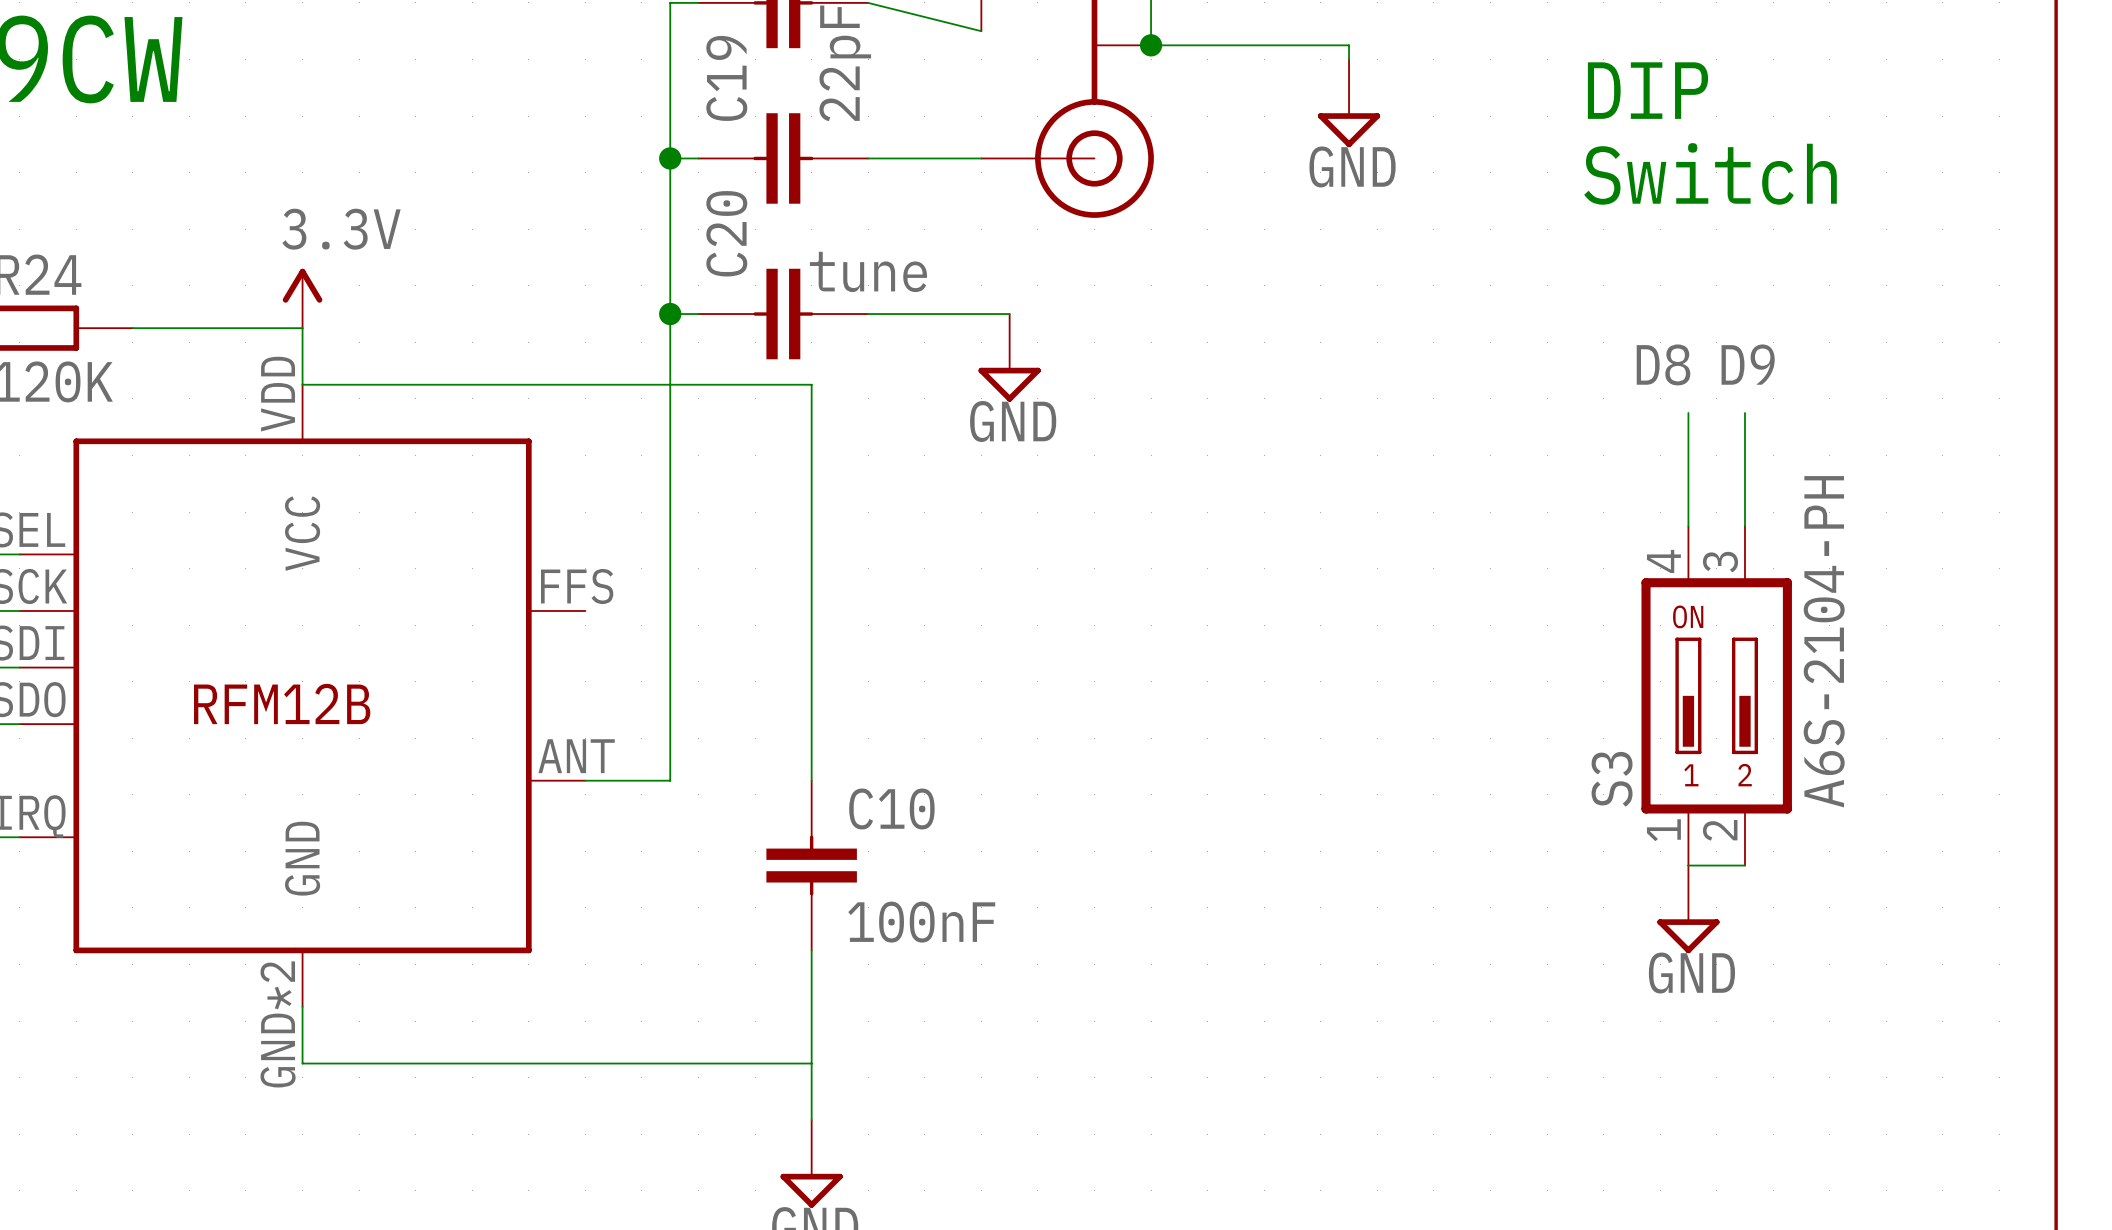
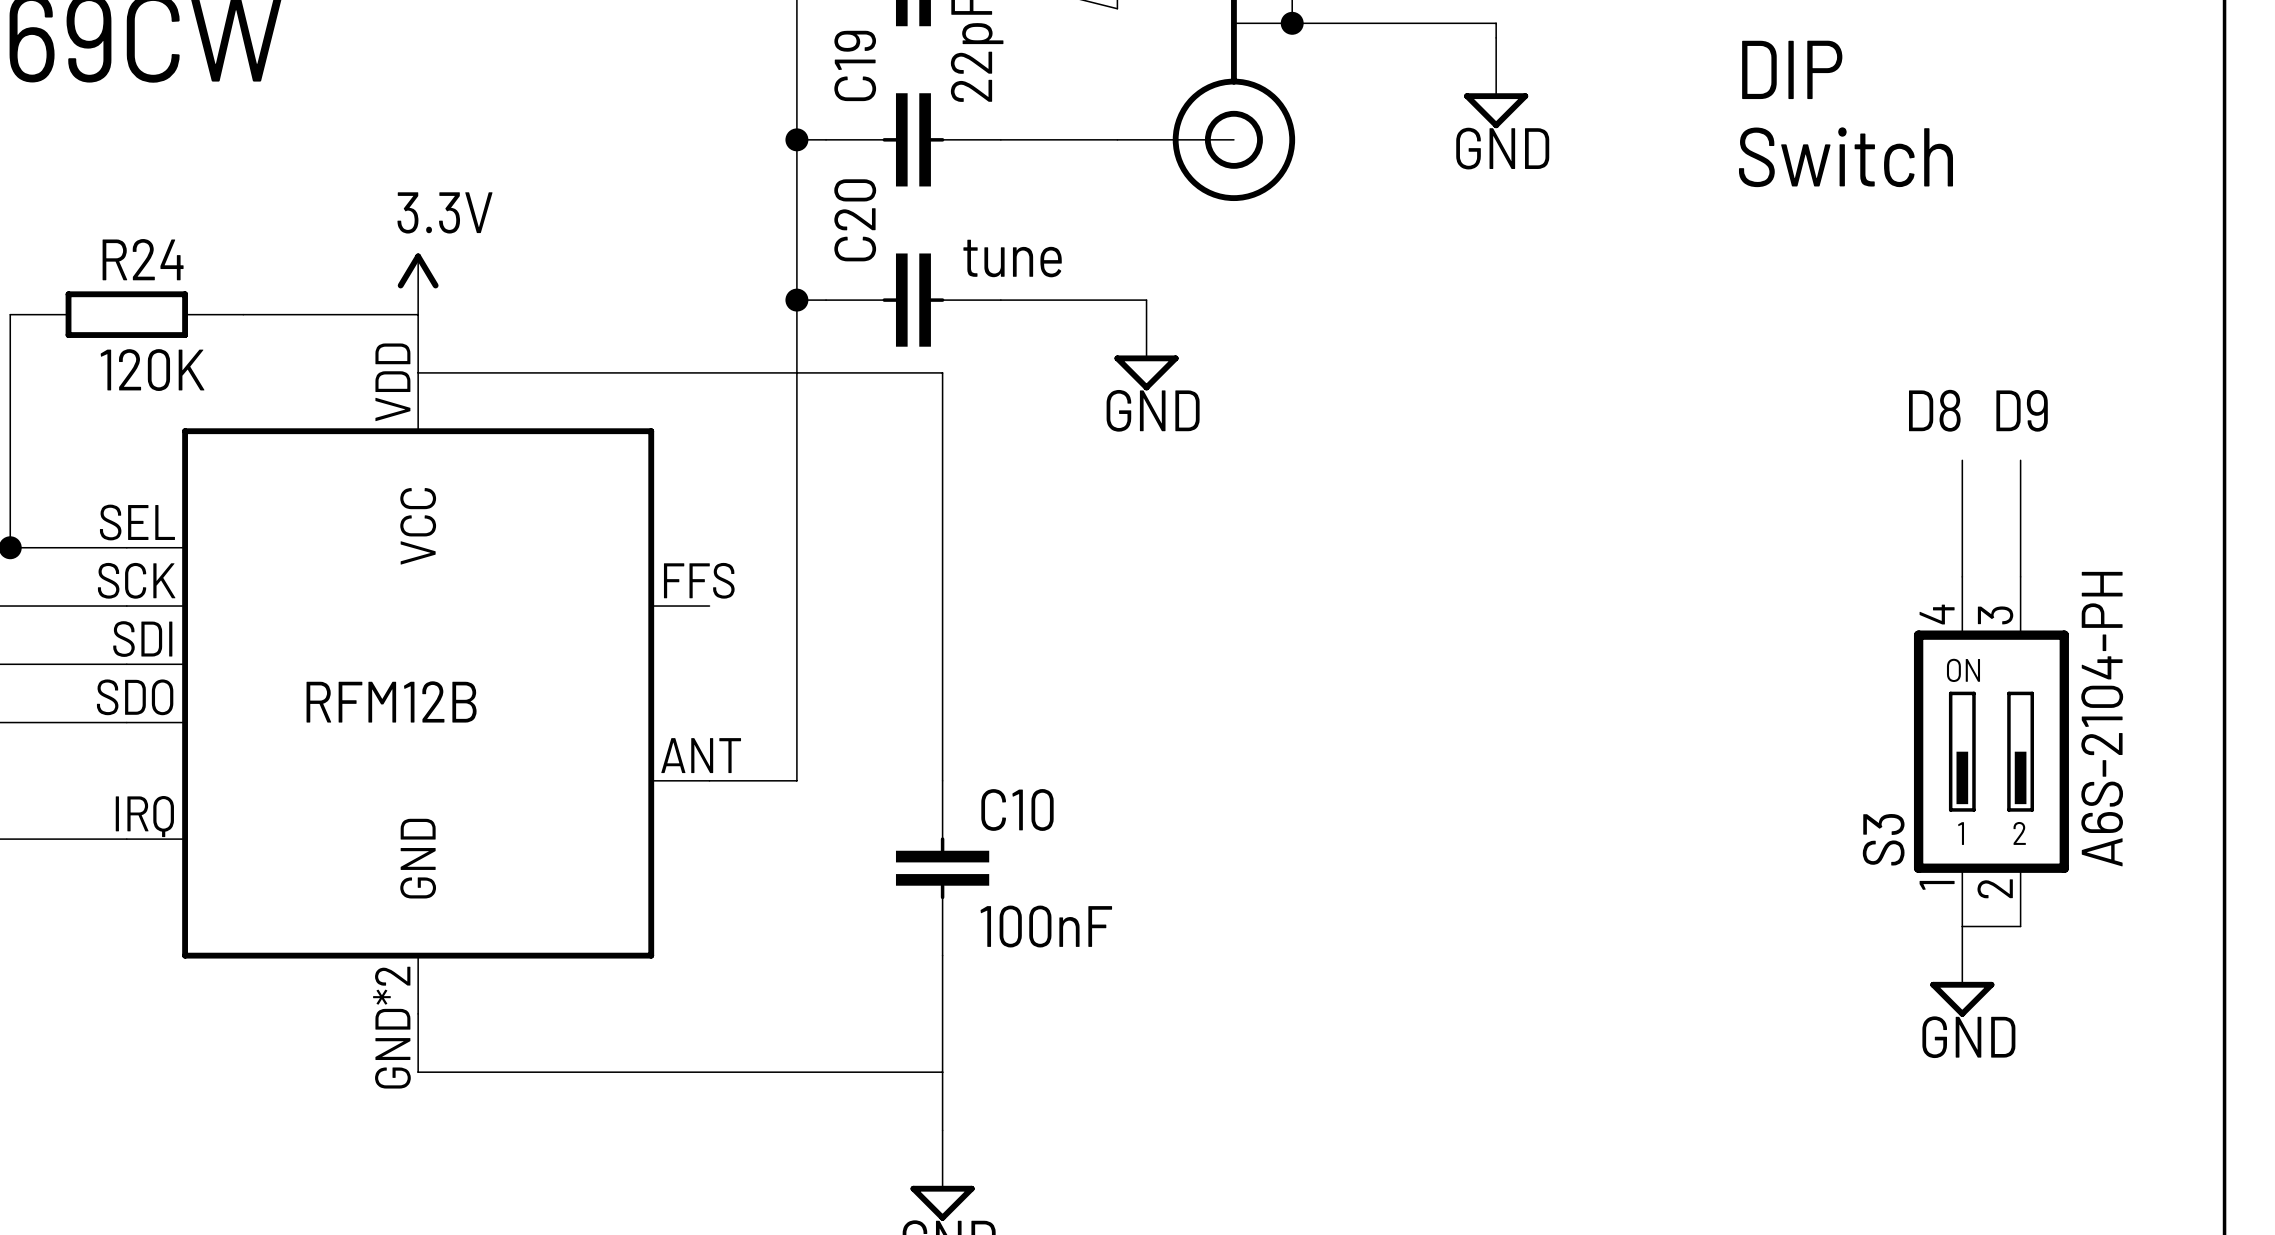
label position: D8 (1663, 364) -> D8 (1934, 410)
label position: D9 (1748, 364) -> D9 (2022, 410)
wire: (1688, 413) (1688, 526) -> (2020, 460) (2020, 576)
wire: (1744, 413) (1744, 526) -> (1962, 460) (1962, 576)
S3 position: (1716, 695) -> (1991, 751)
wire: (1688, 865) (1744, 865) -> (1962, 926) (2020, 926)
power symbol position: GND (1688, 909) -> GND (1962, 971)

